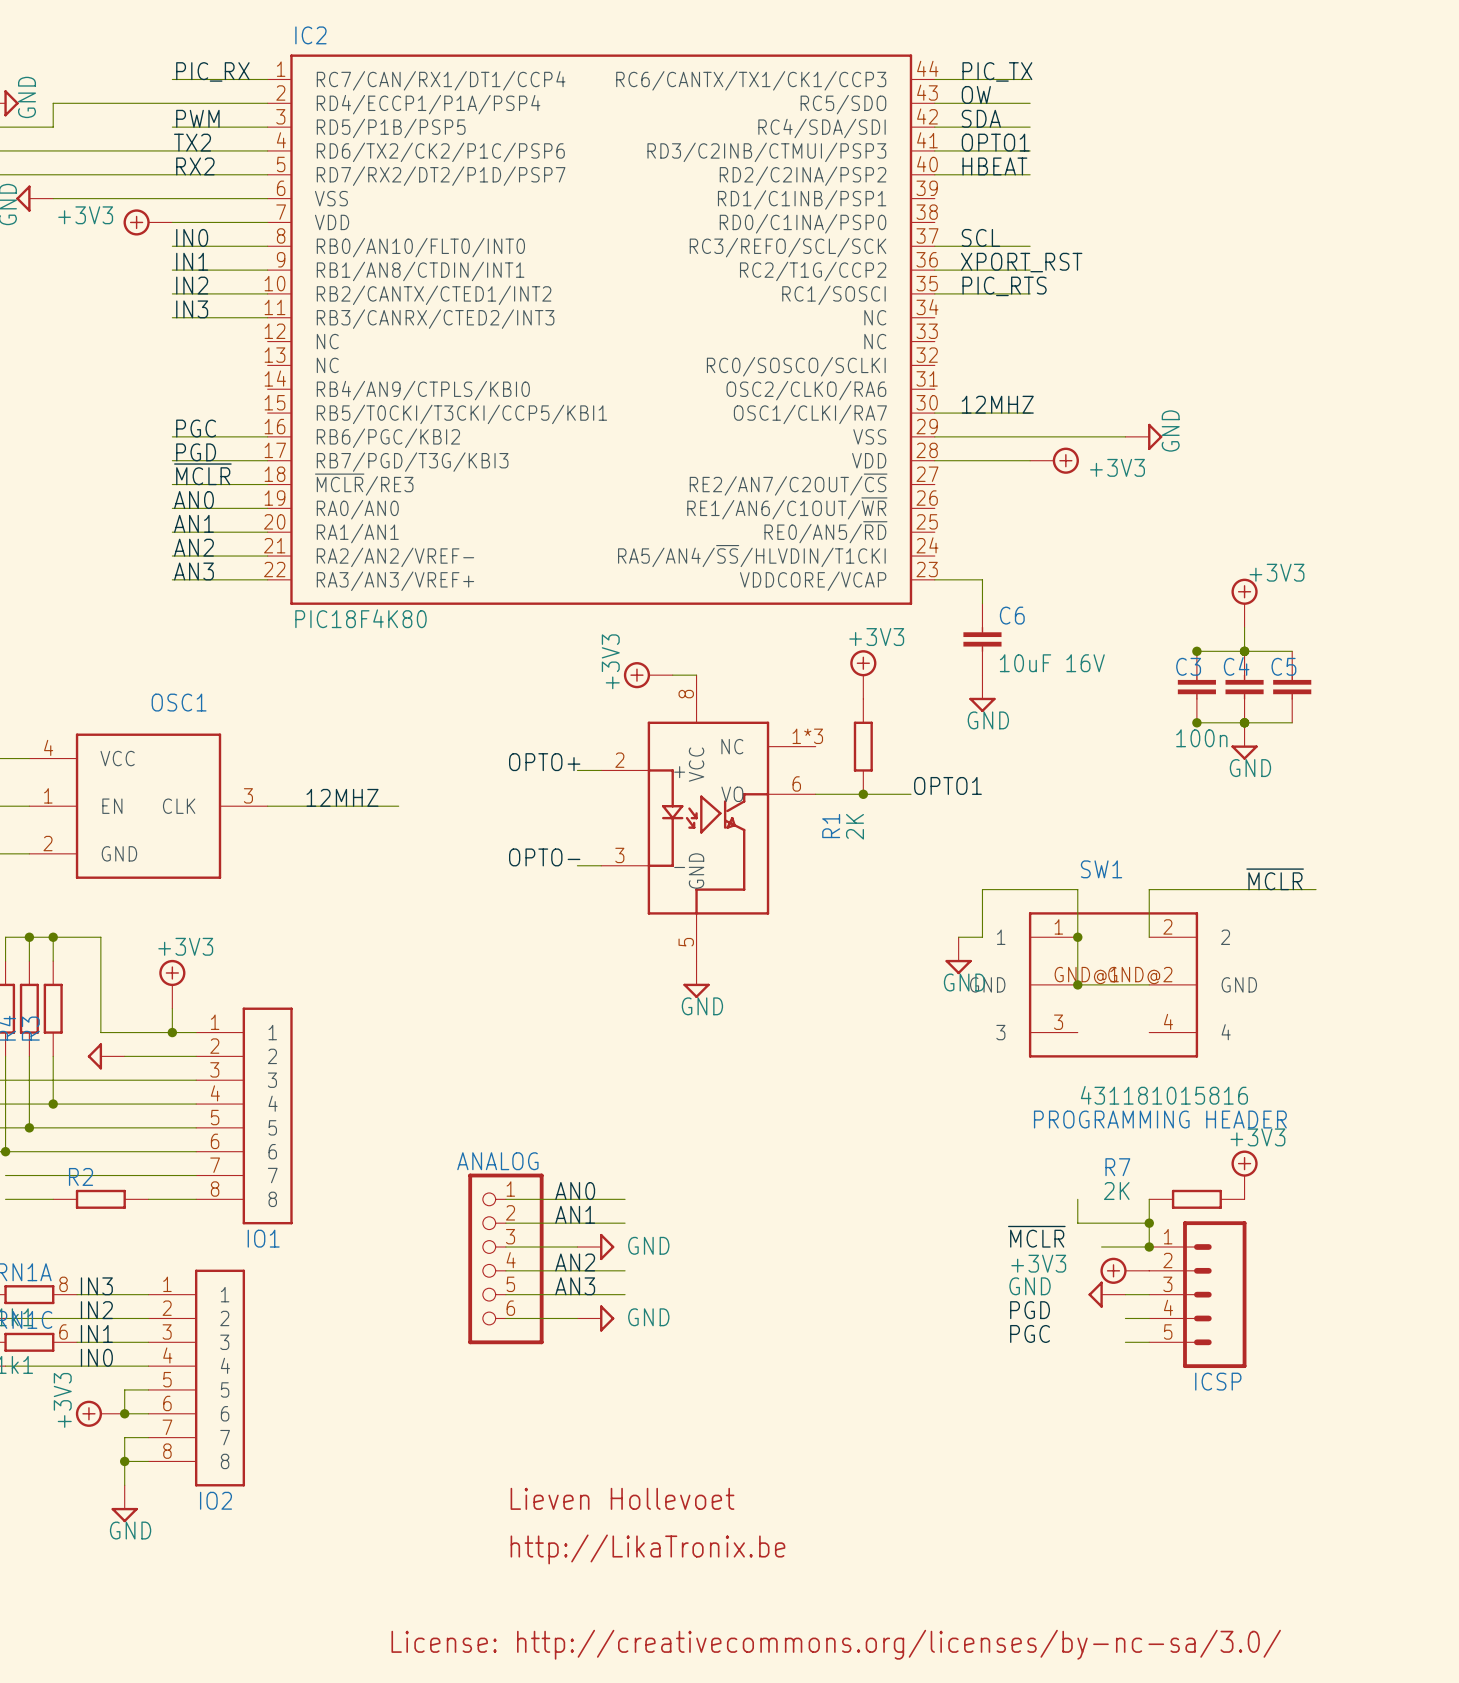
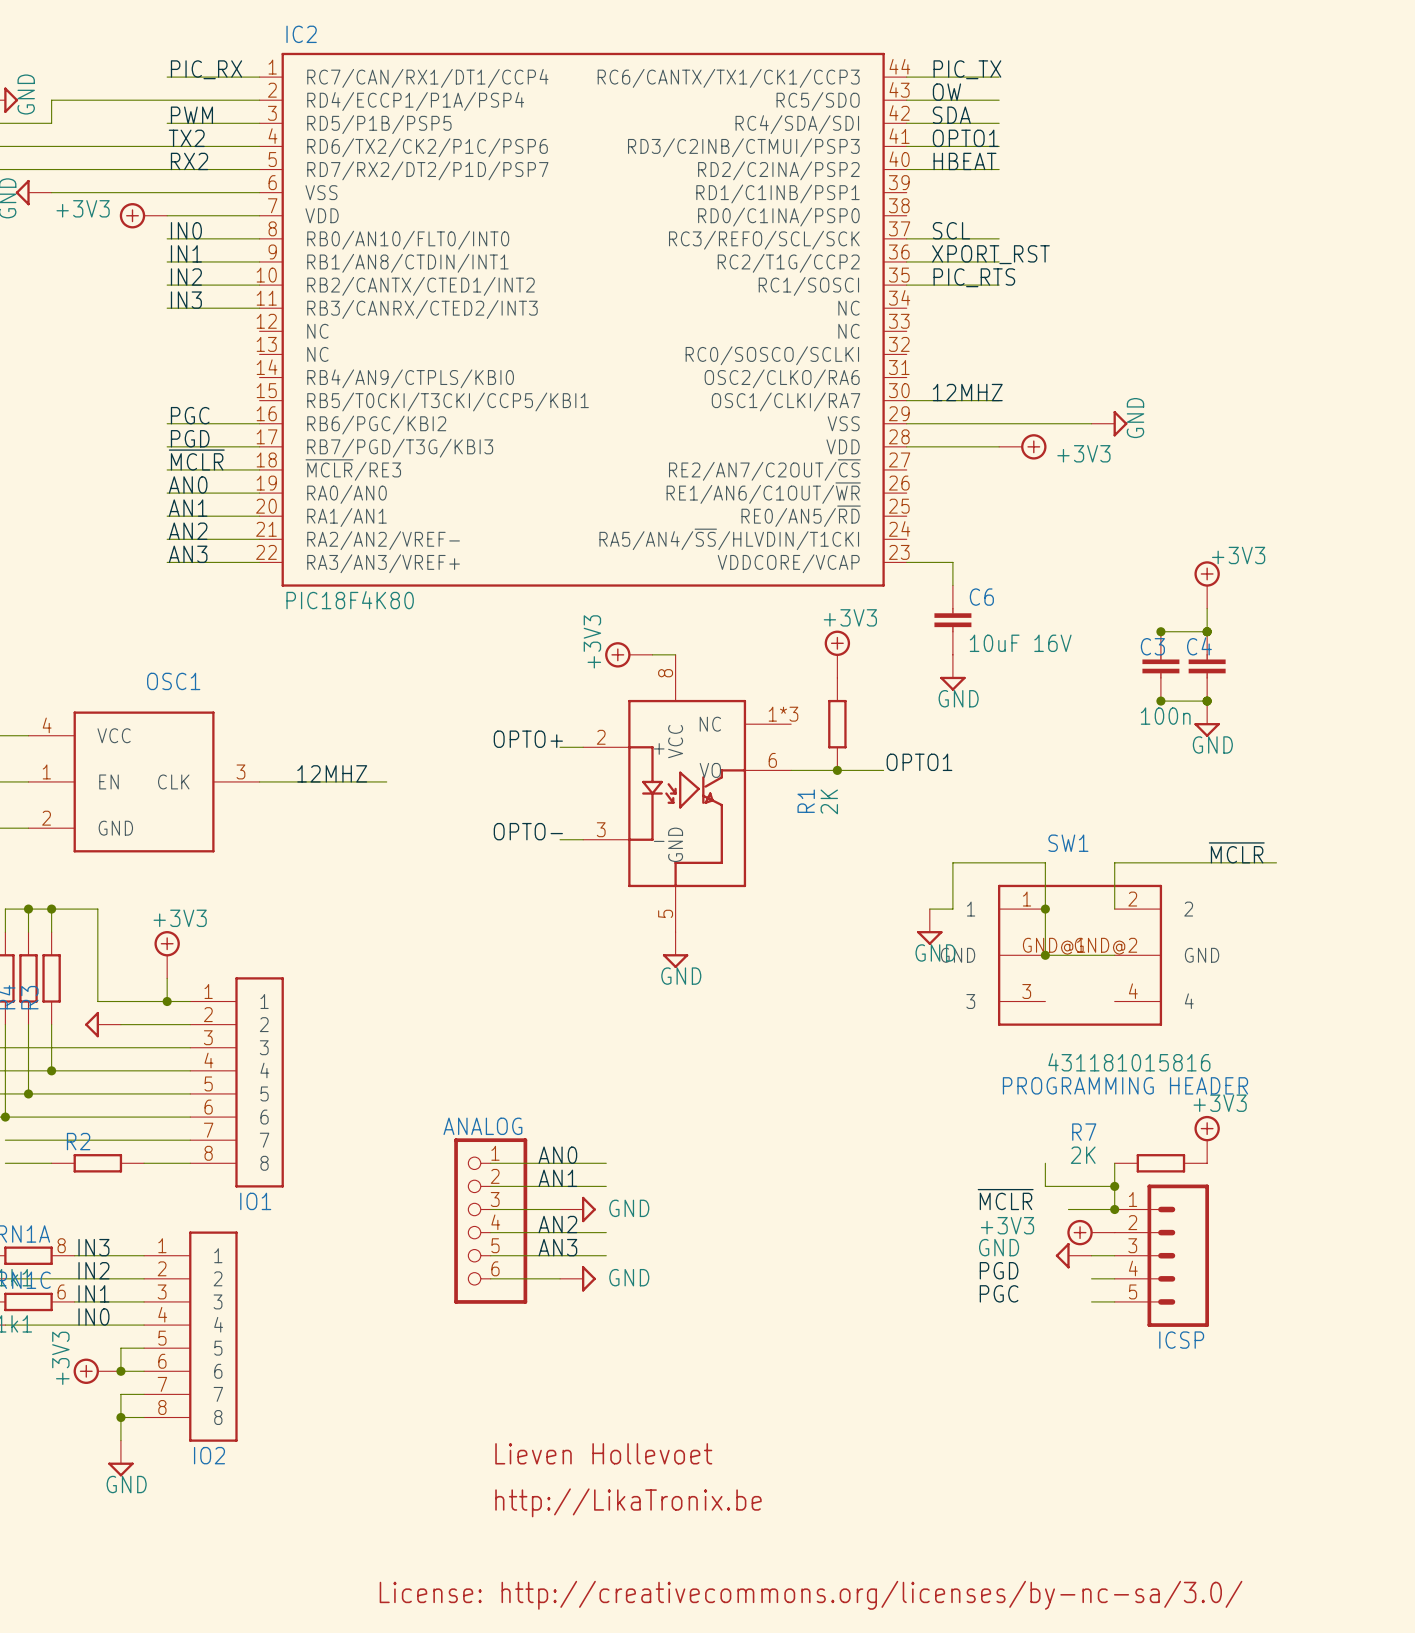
wire: (1244, 651) (1292, 651) -> none
C5: (1292, 687) -> none
wire: (1244, 722) (1292, 722) -> none

